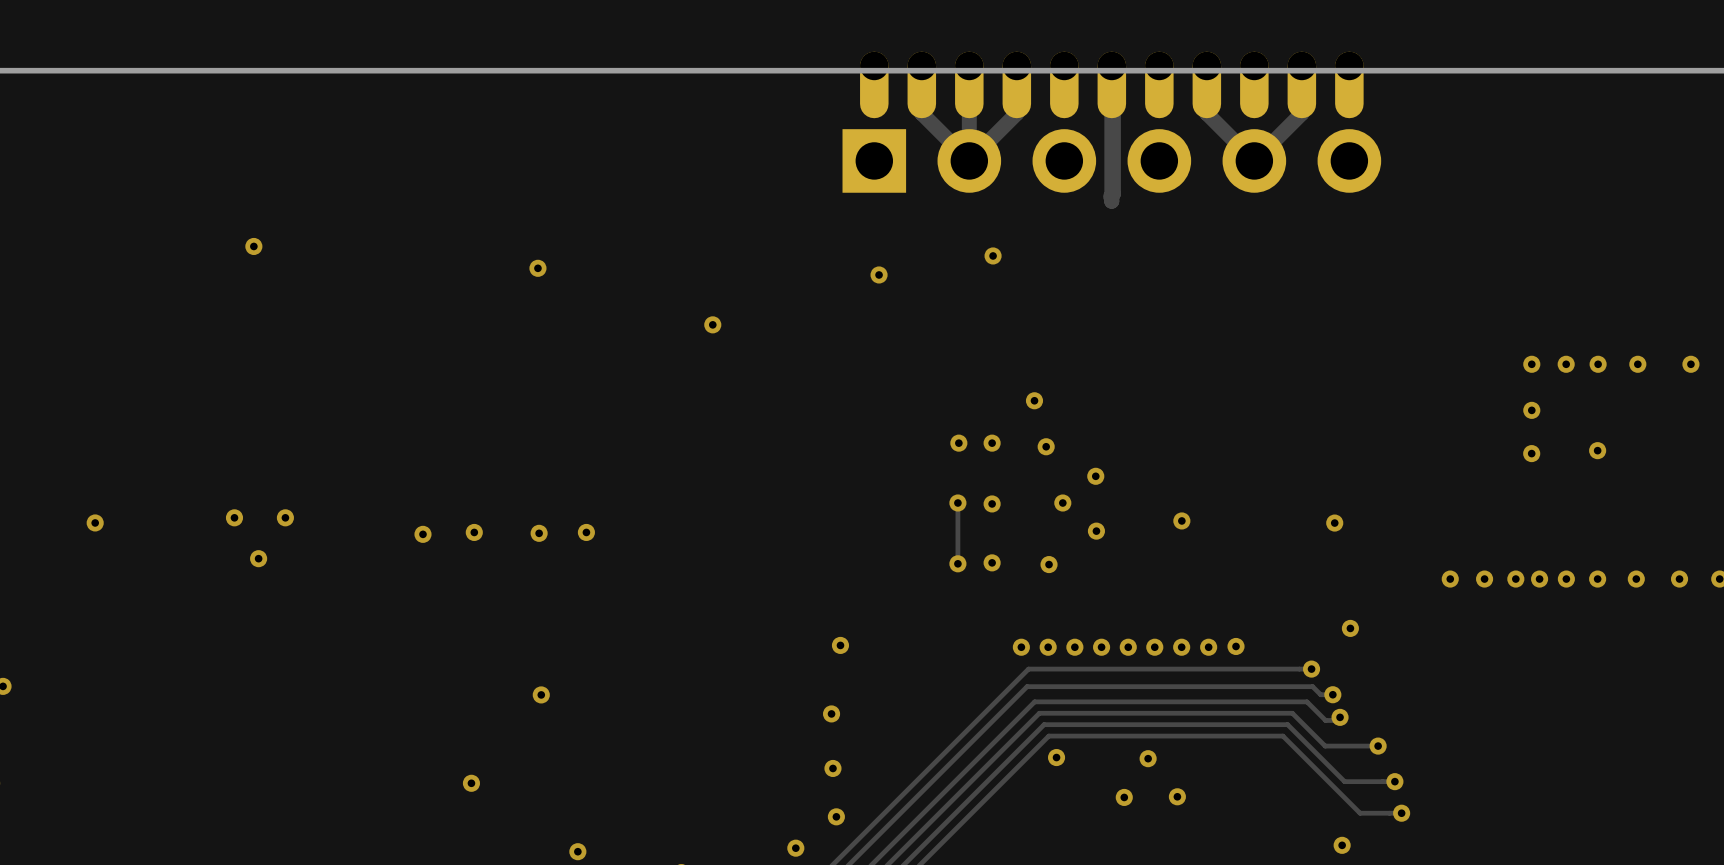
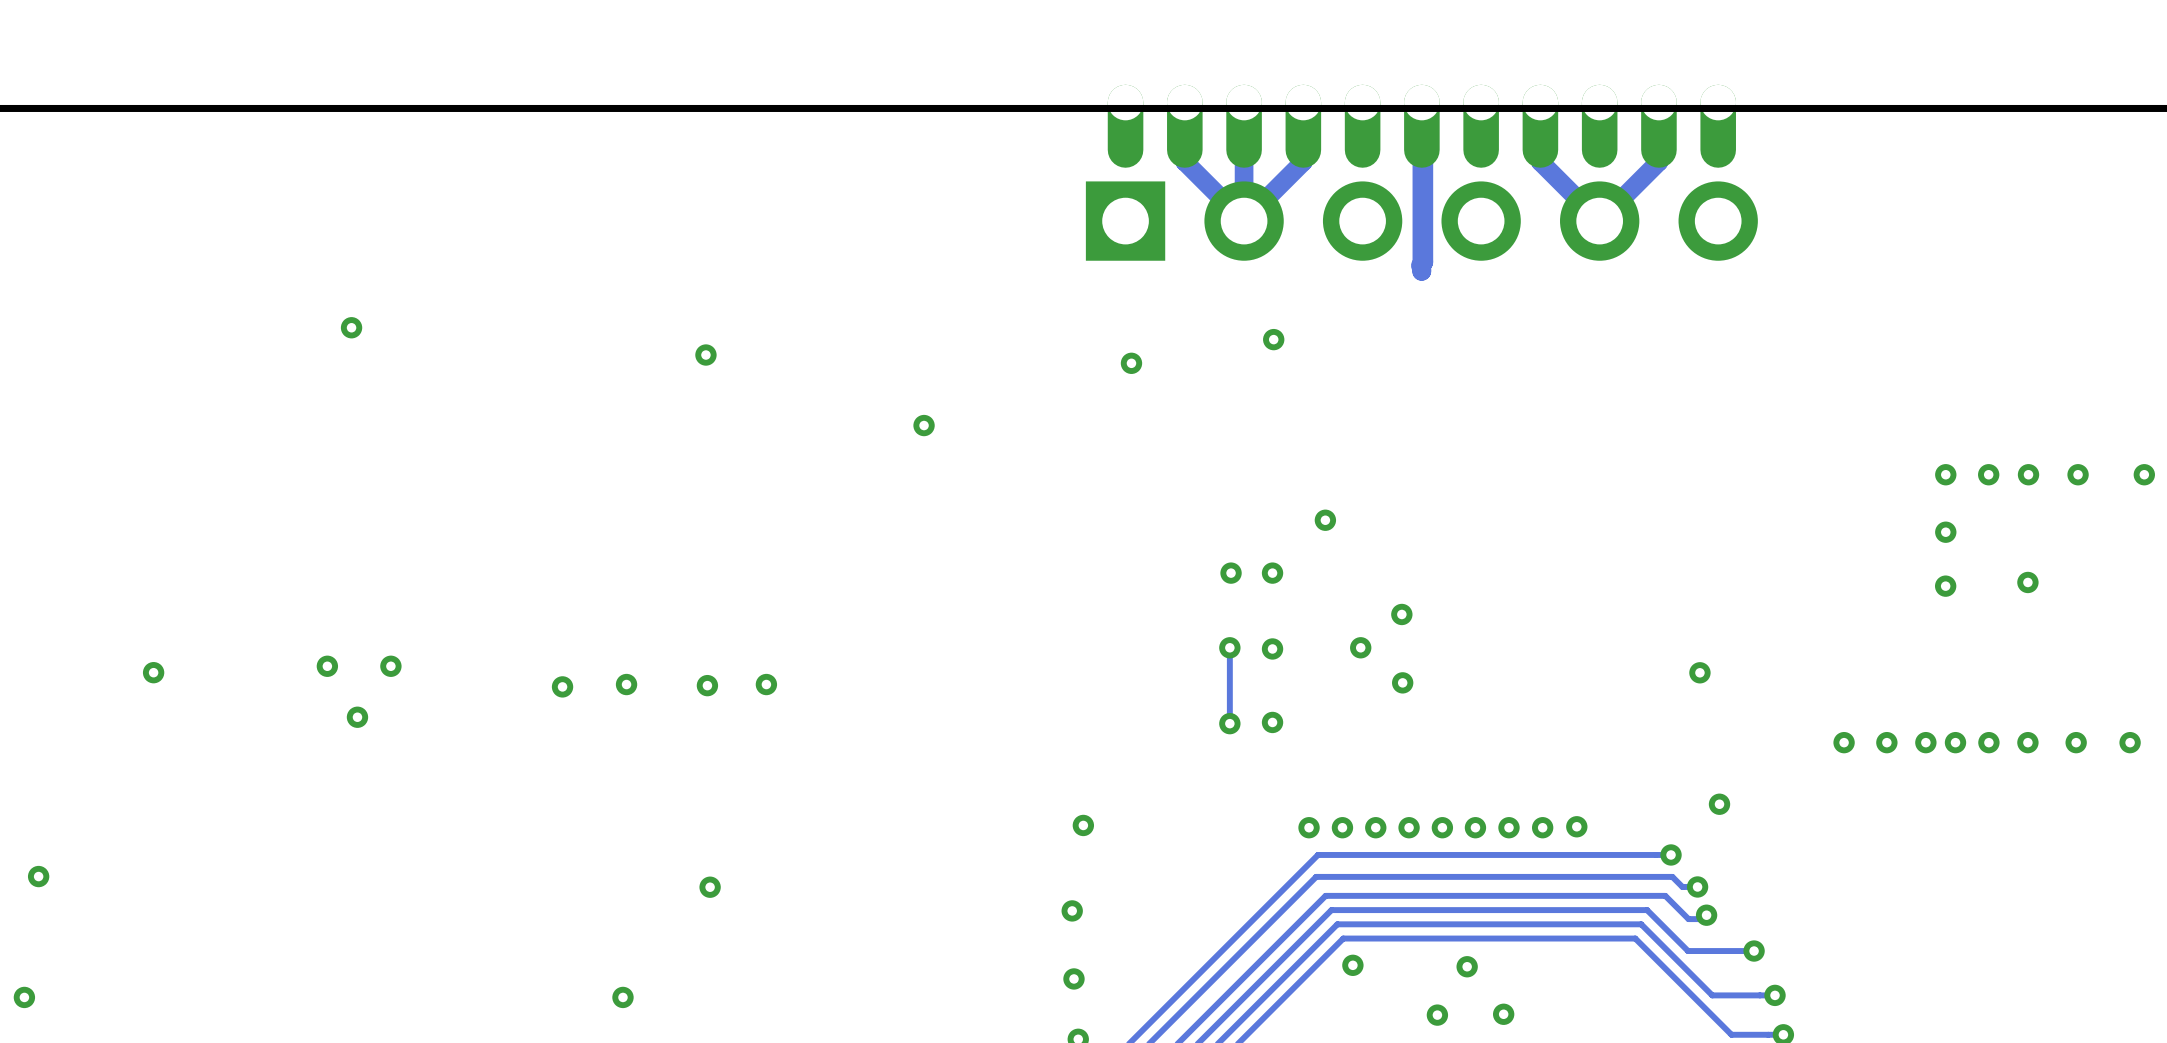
via: (1046, 446) -> none
via: (1181, 520) -> none
via: (1049, 564) -> none

